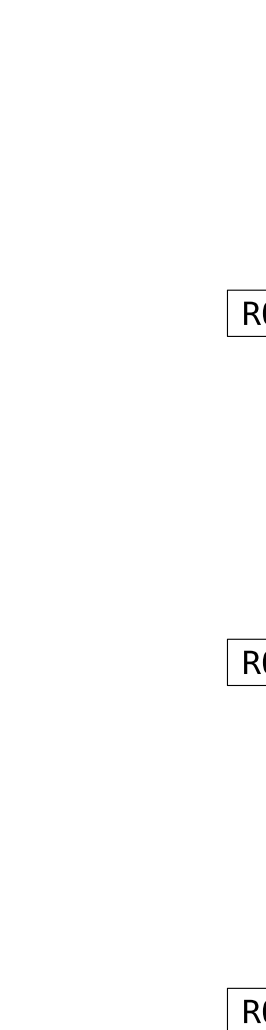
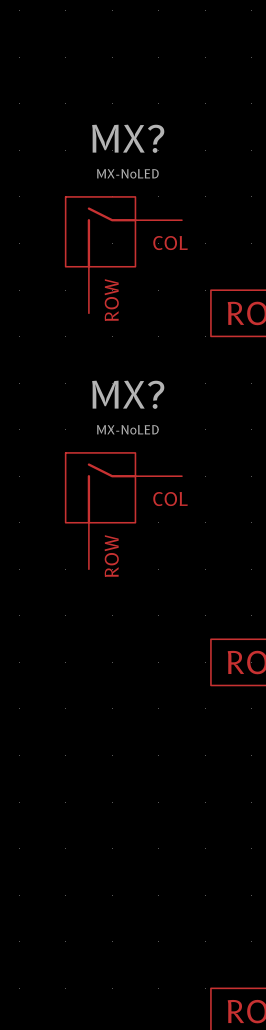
MX?: none -> MX-NoLED (123, 255)
MX?: none -> MX-NoLED (123, 511)

